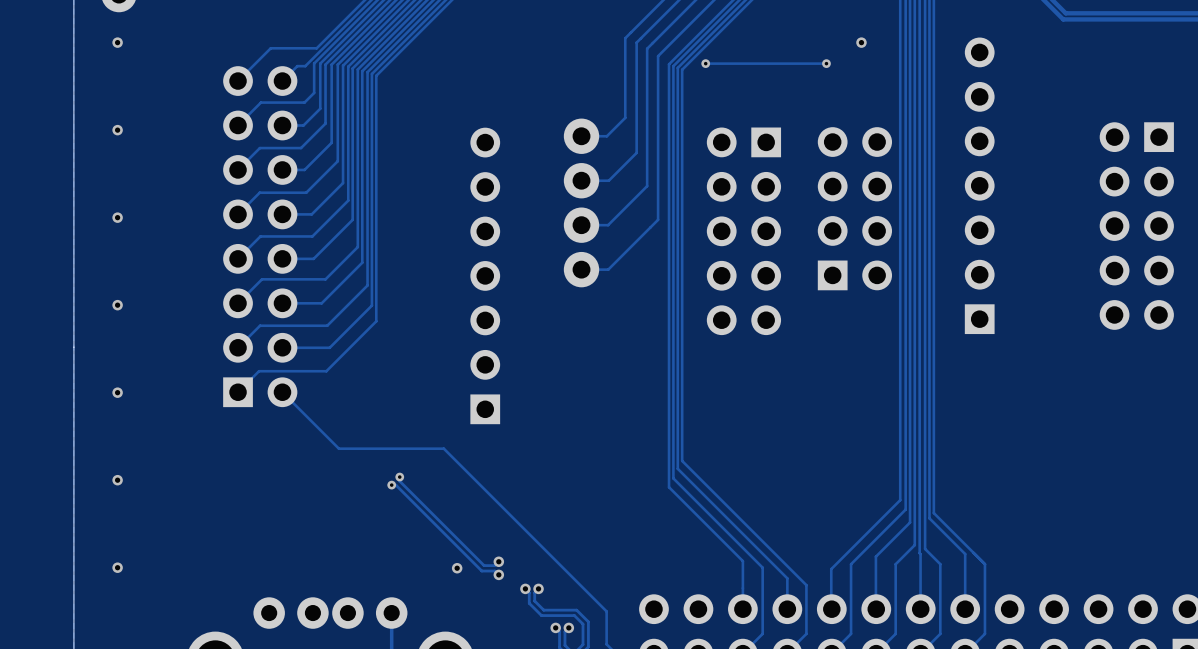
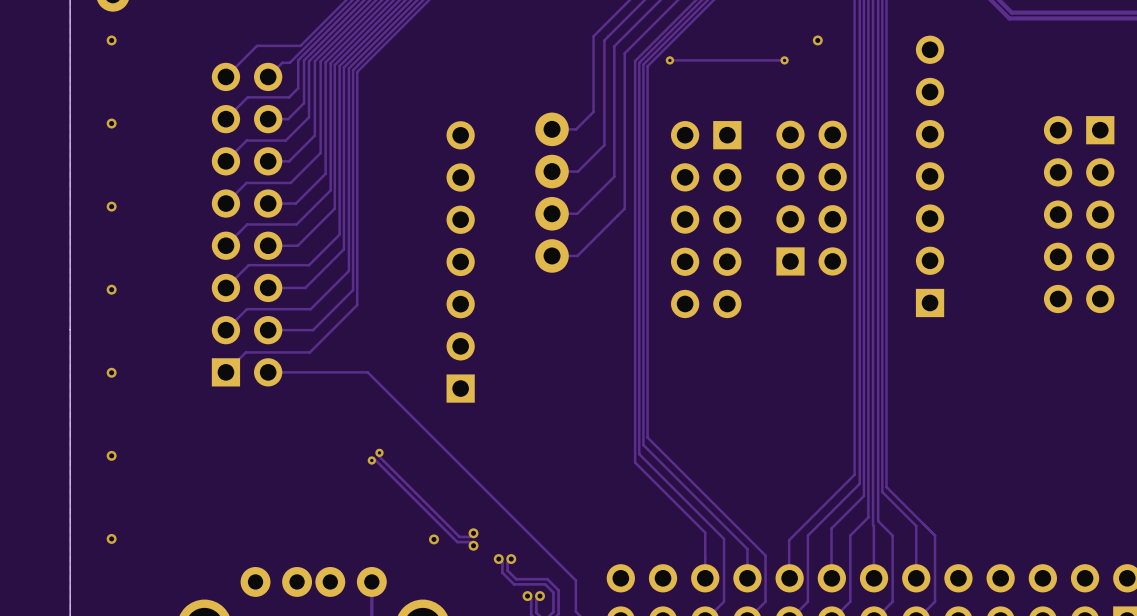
track: (282, 392) (338, 448) (443, 448) -> (268, 372) (367, 372) (421, 425)

